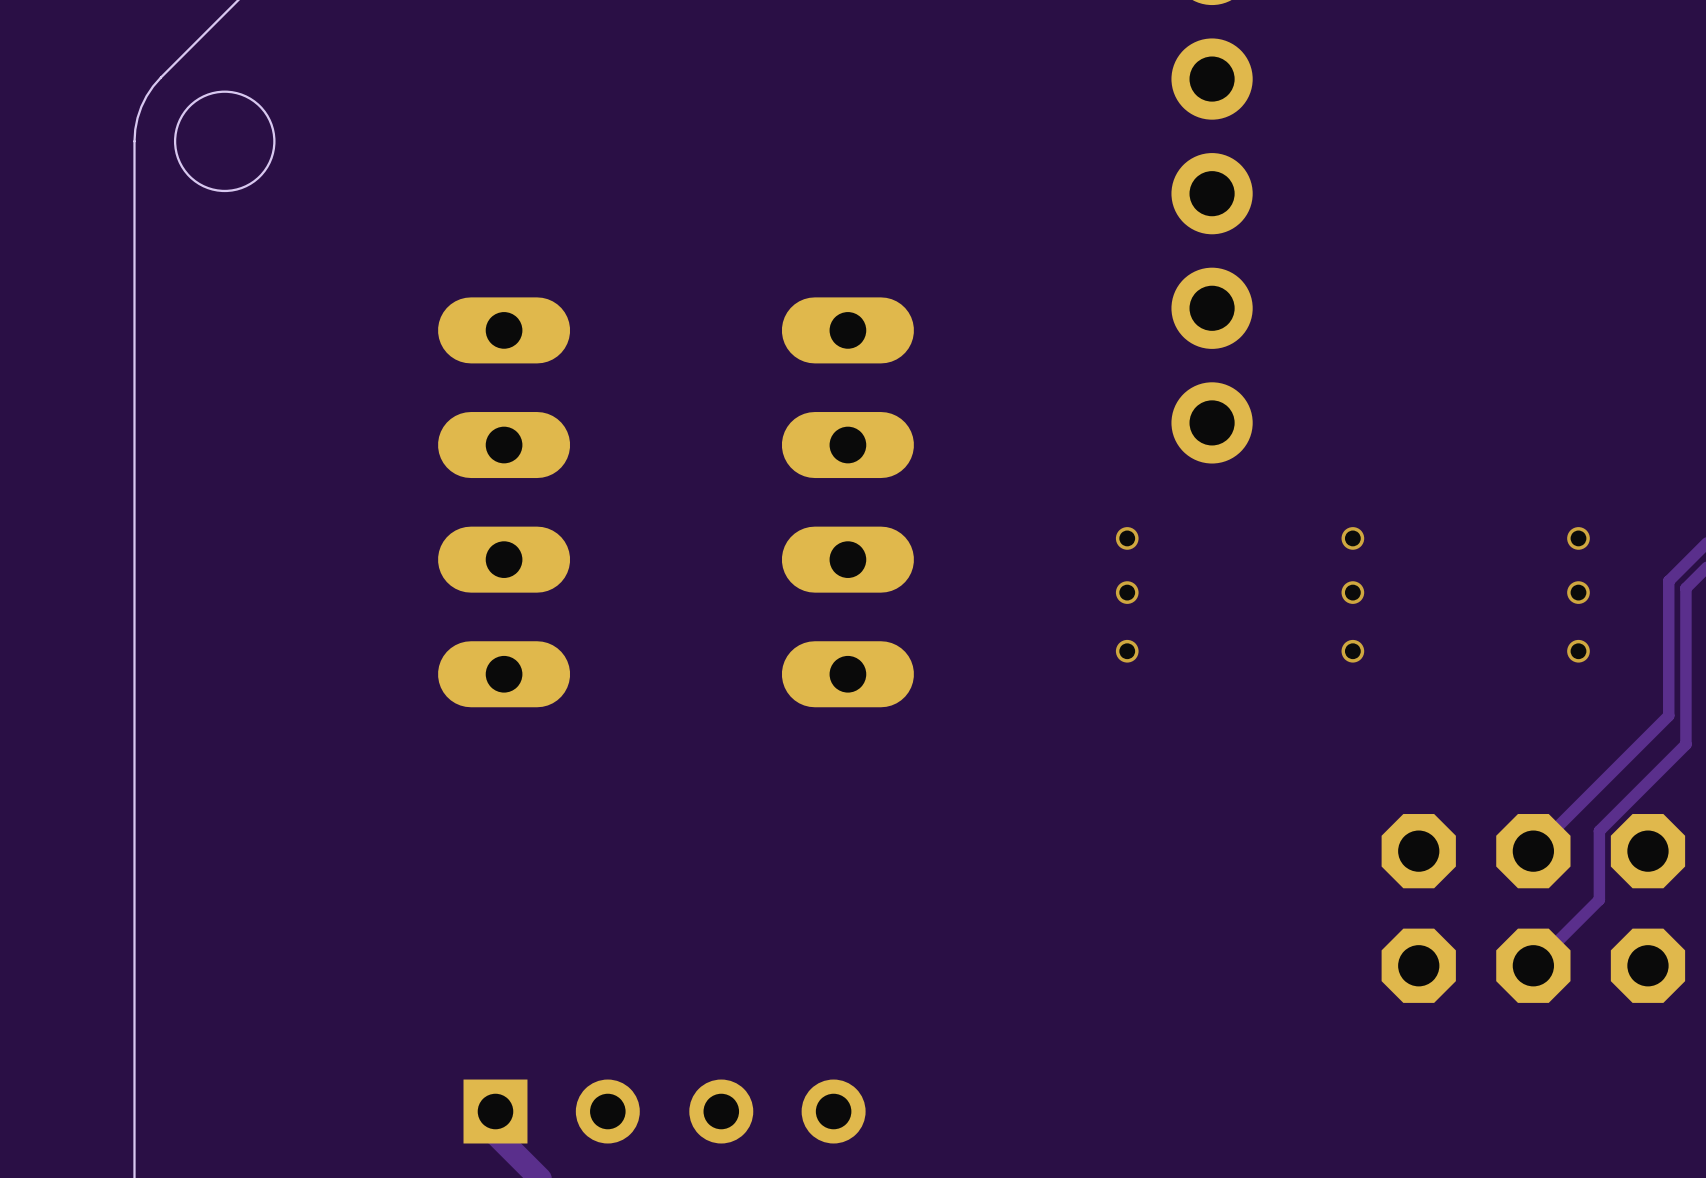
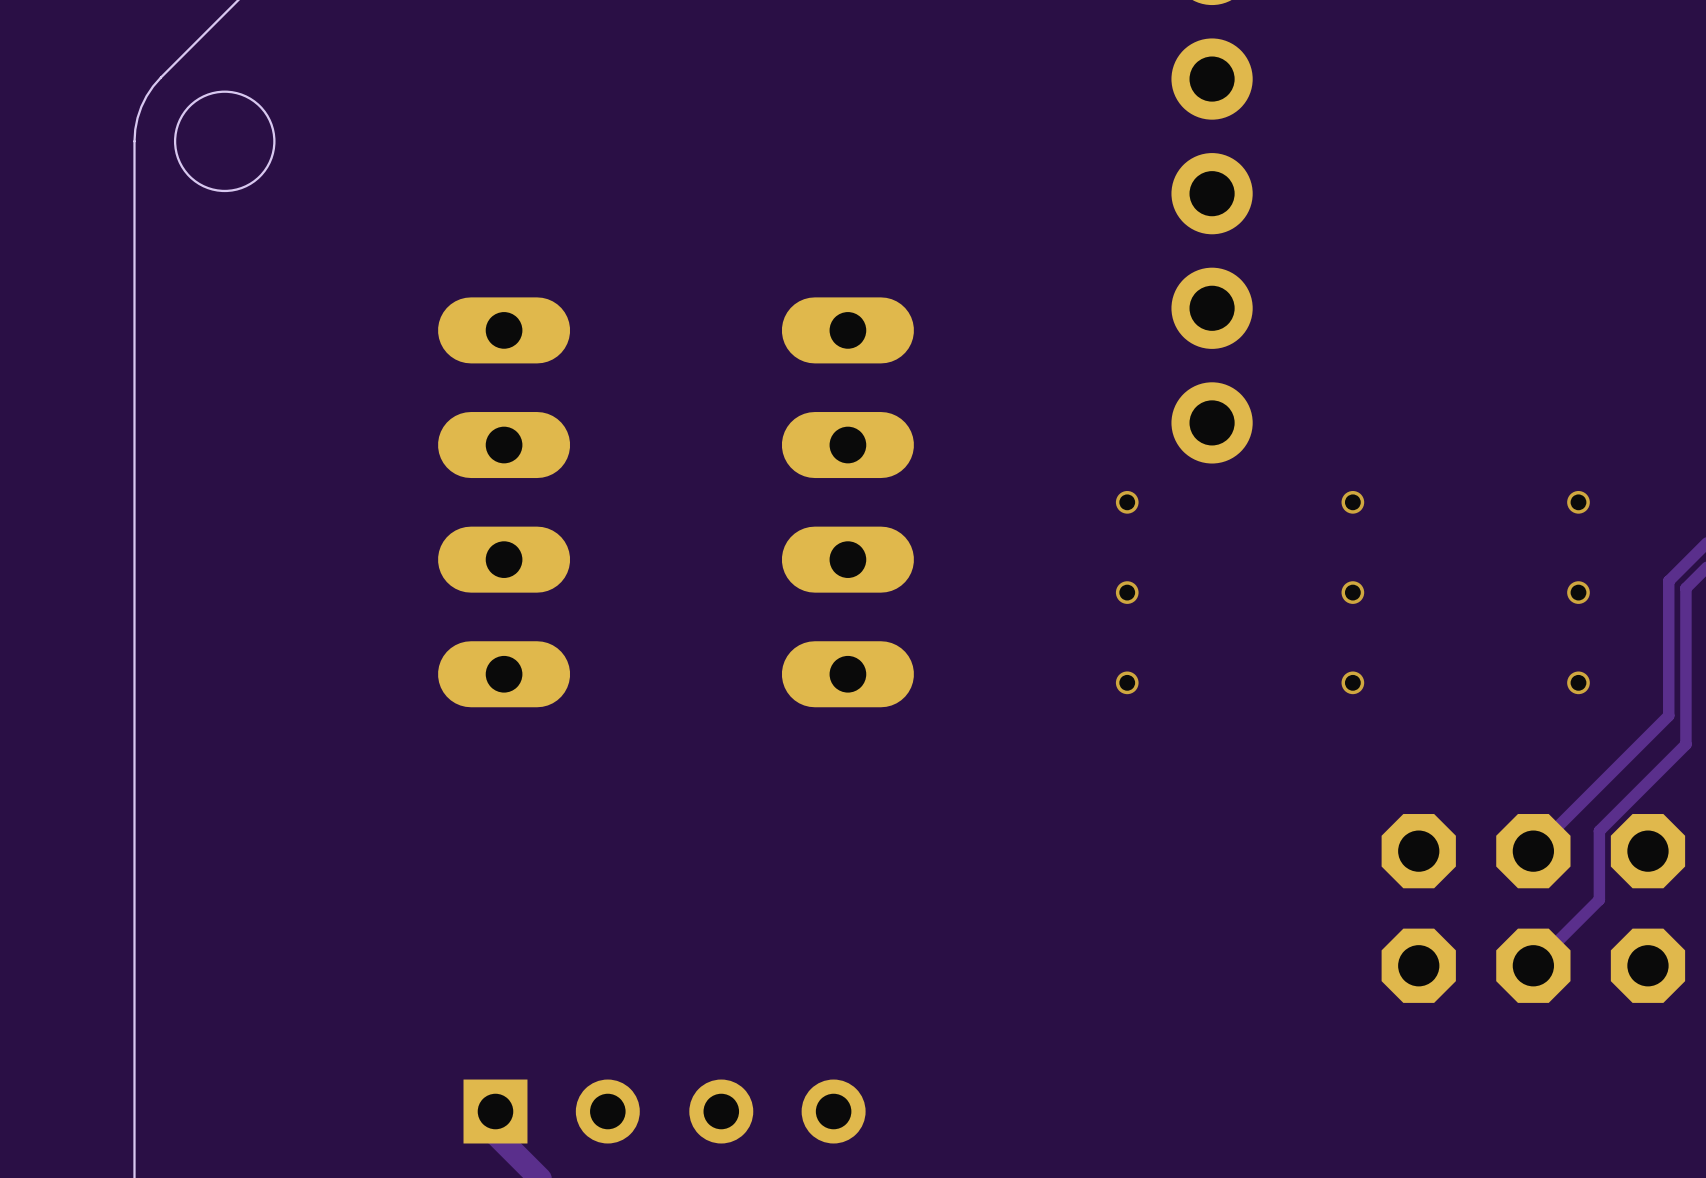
via position: (1127, 538) -> (1127, 502)
via position: (1352, 538) -> (1352, 502)
via position: (1578, 538) -> (1578, 502)
via position: (1127, 651) -> (1127, 682)
via position: (1352, 651) -> (1352, 682)
via position: (1578, 651) -> (1578, 682)

